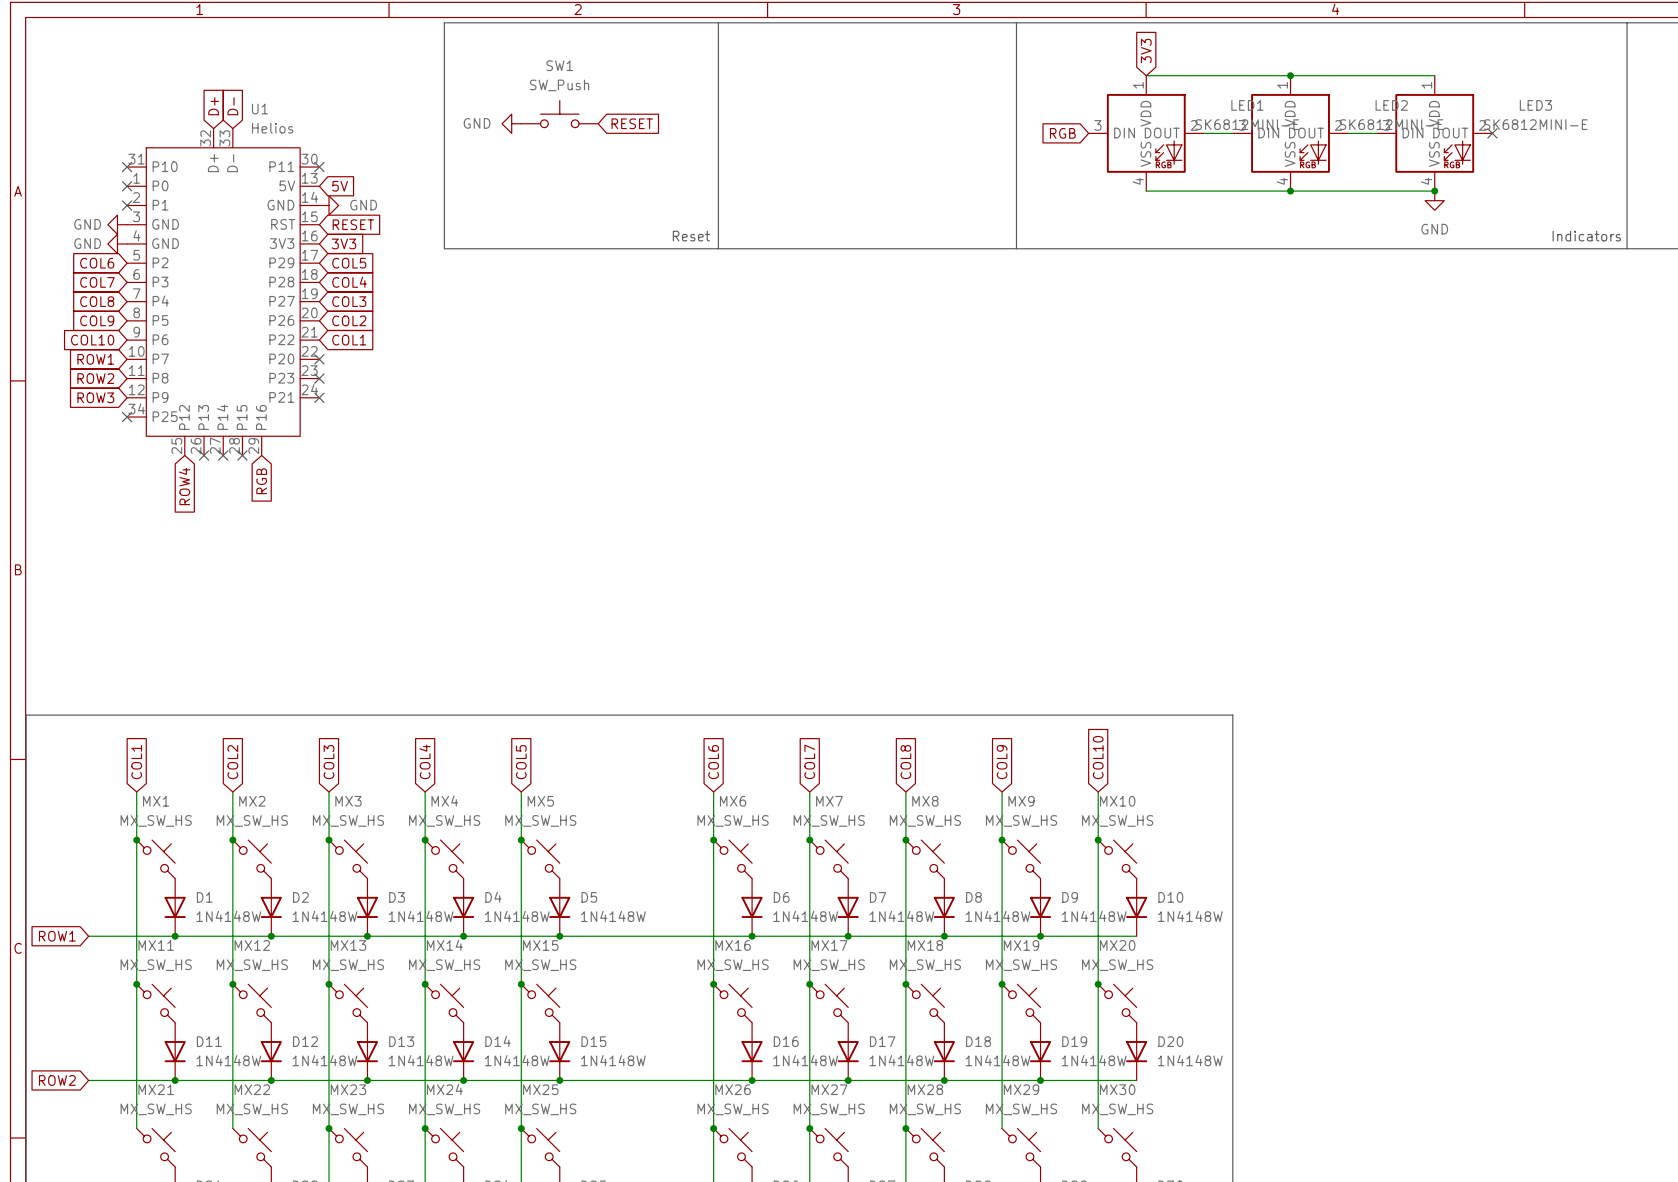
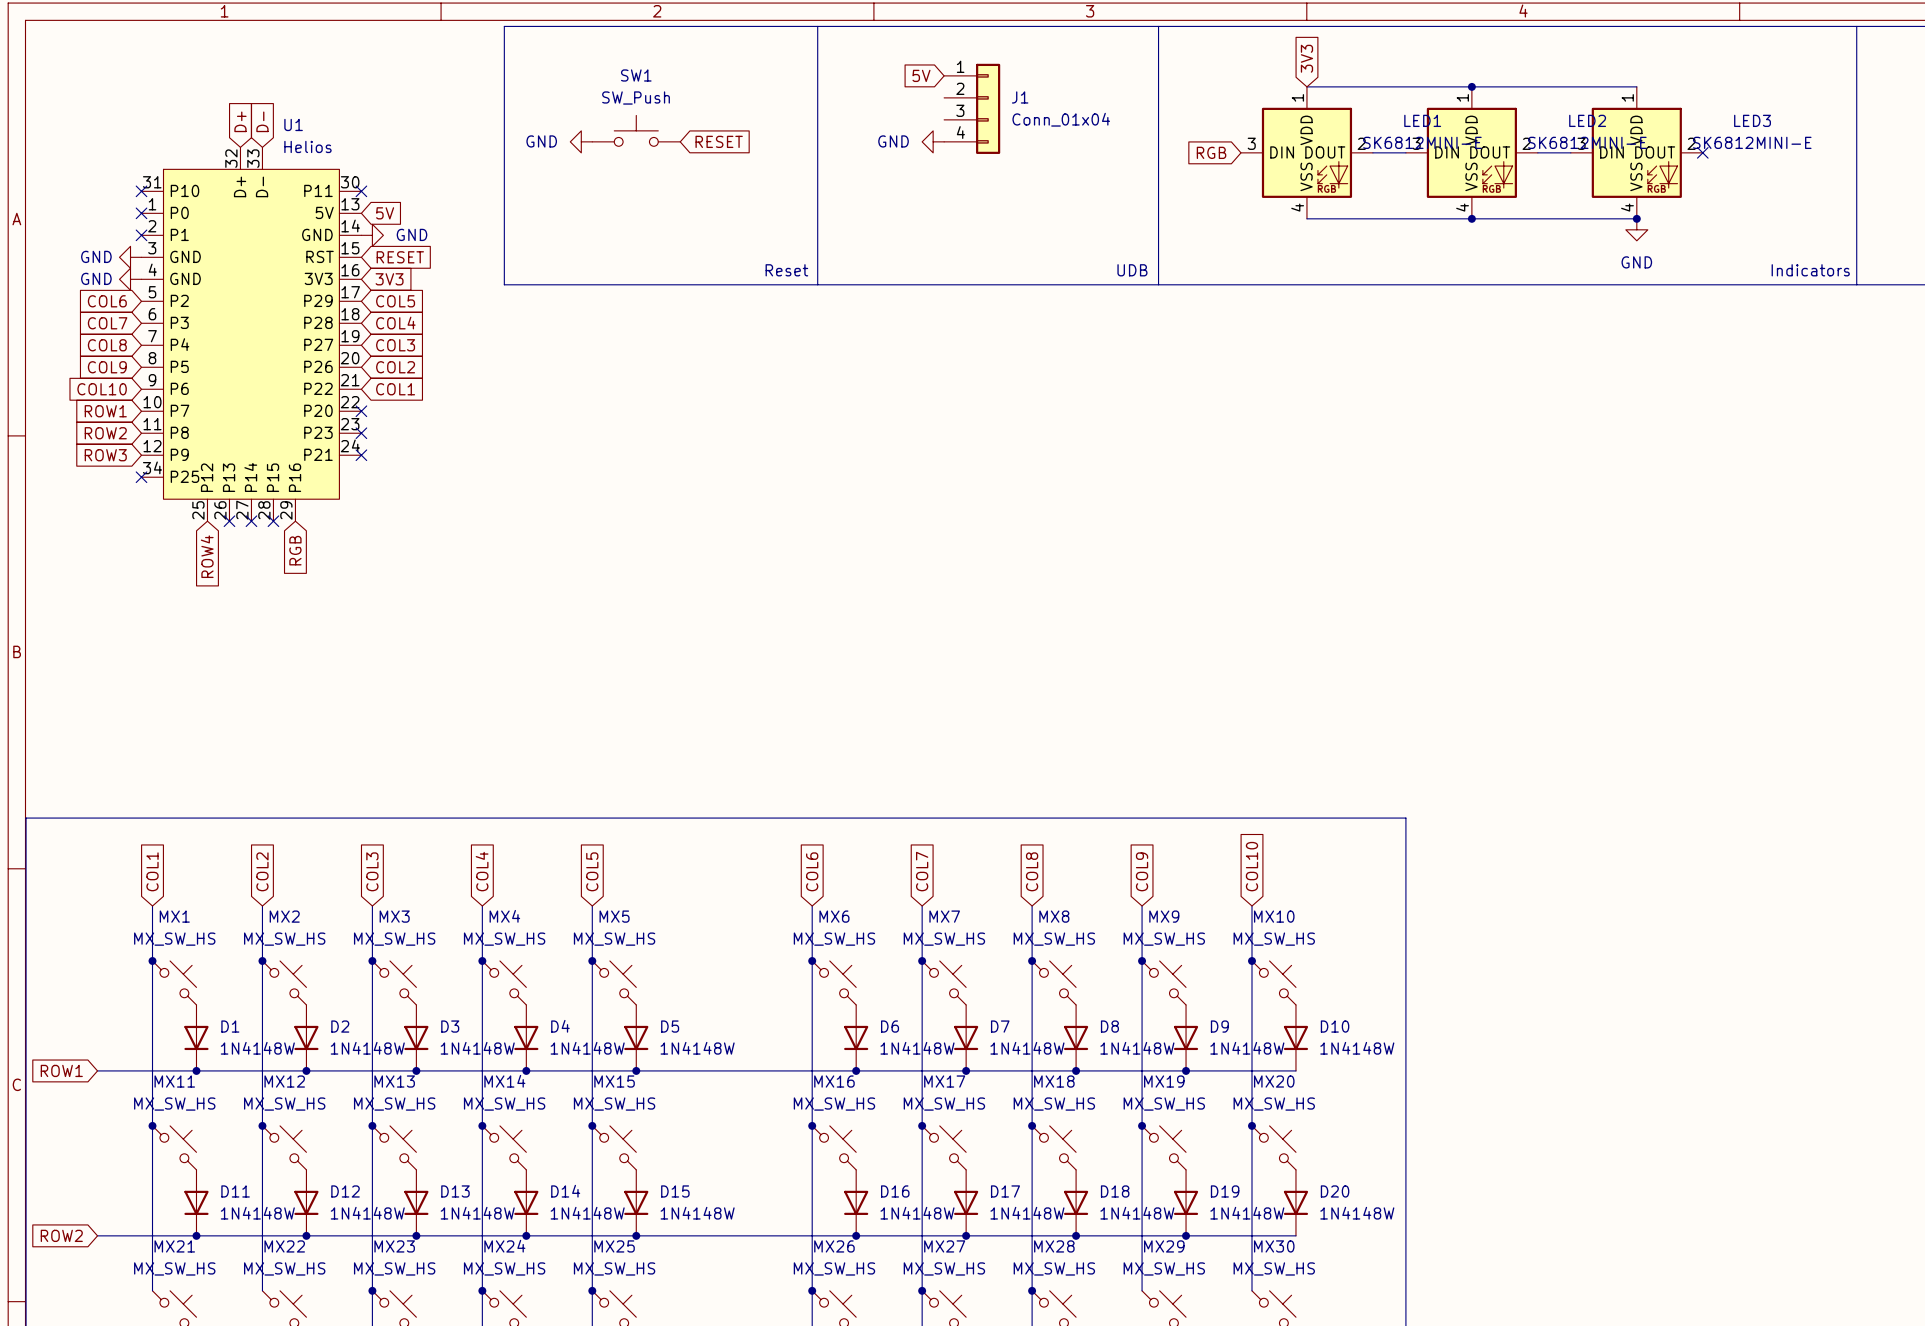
global label: none -> 5V (921, 75)
J1: none -> Conn_01x04 (972, 108)
power symbol: none -> GND (933, 141)
text: none -> UDB (1132, 270)

